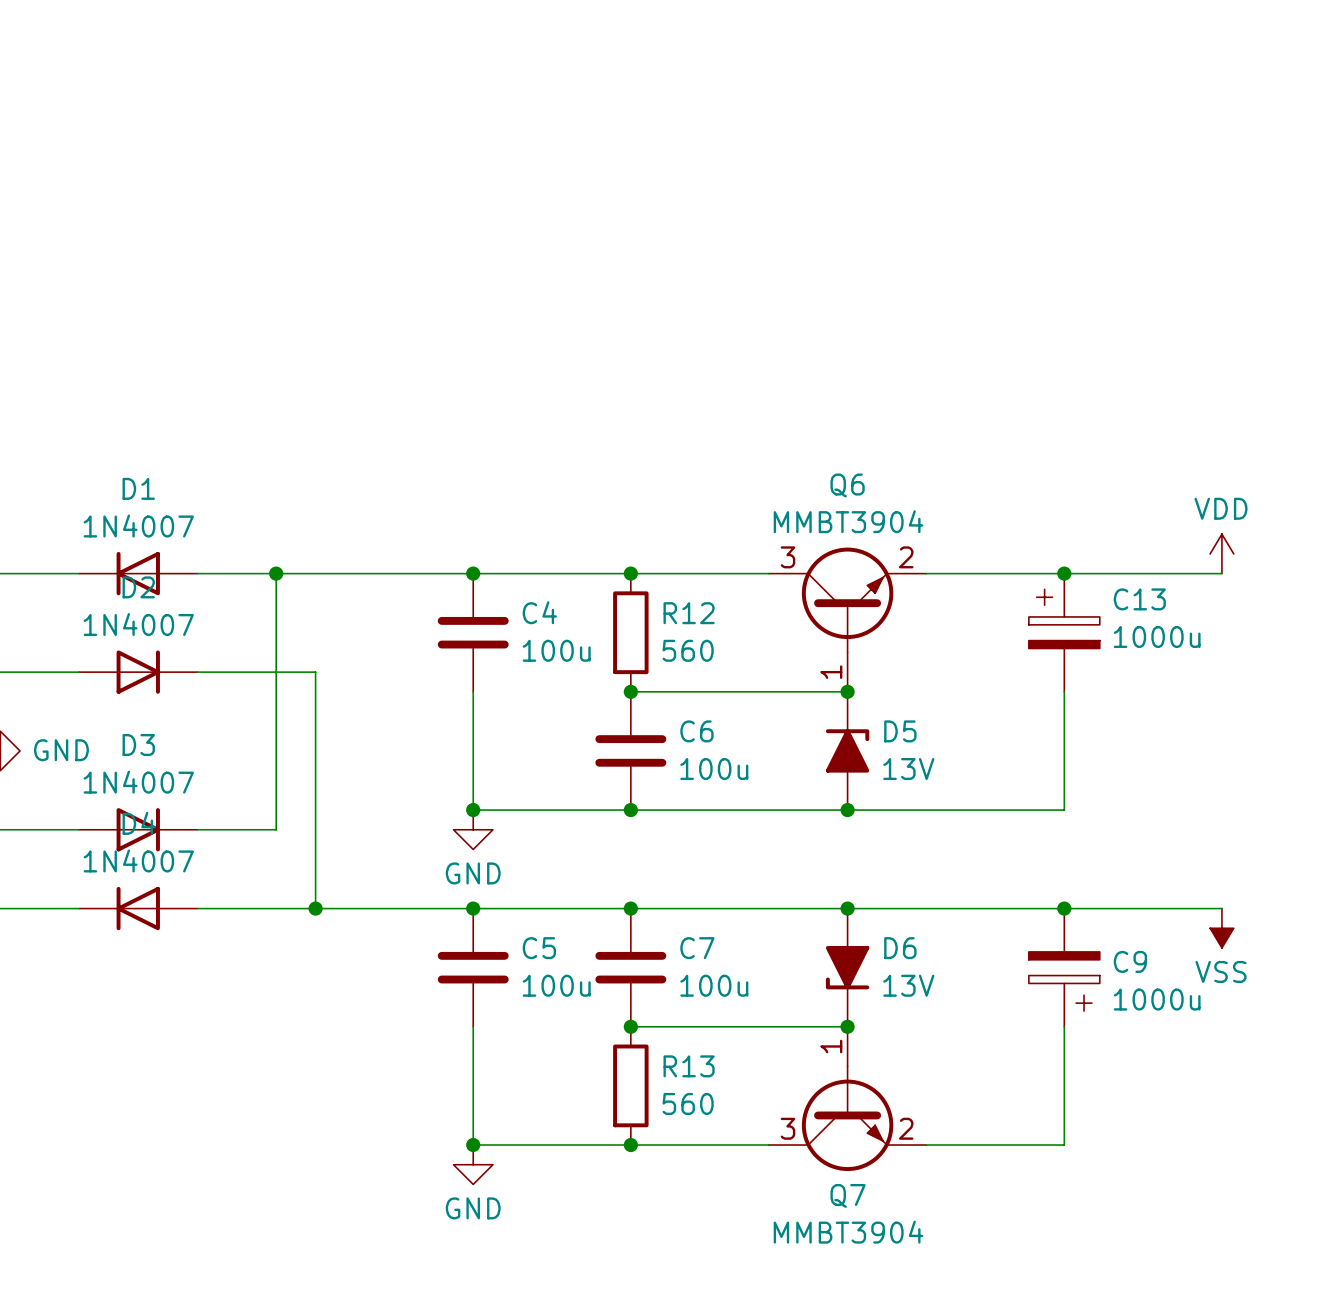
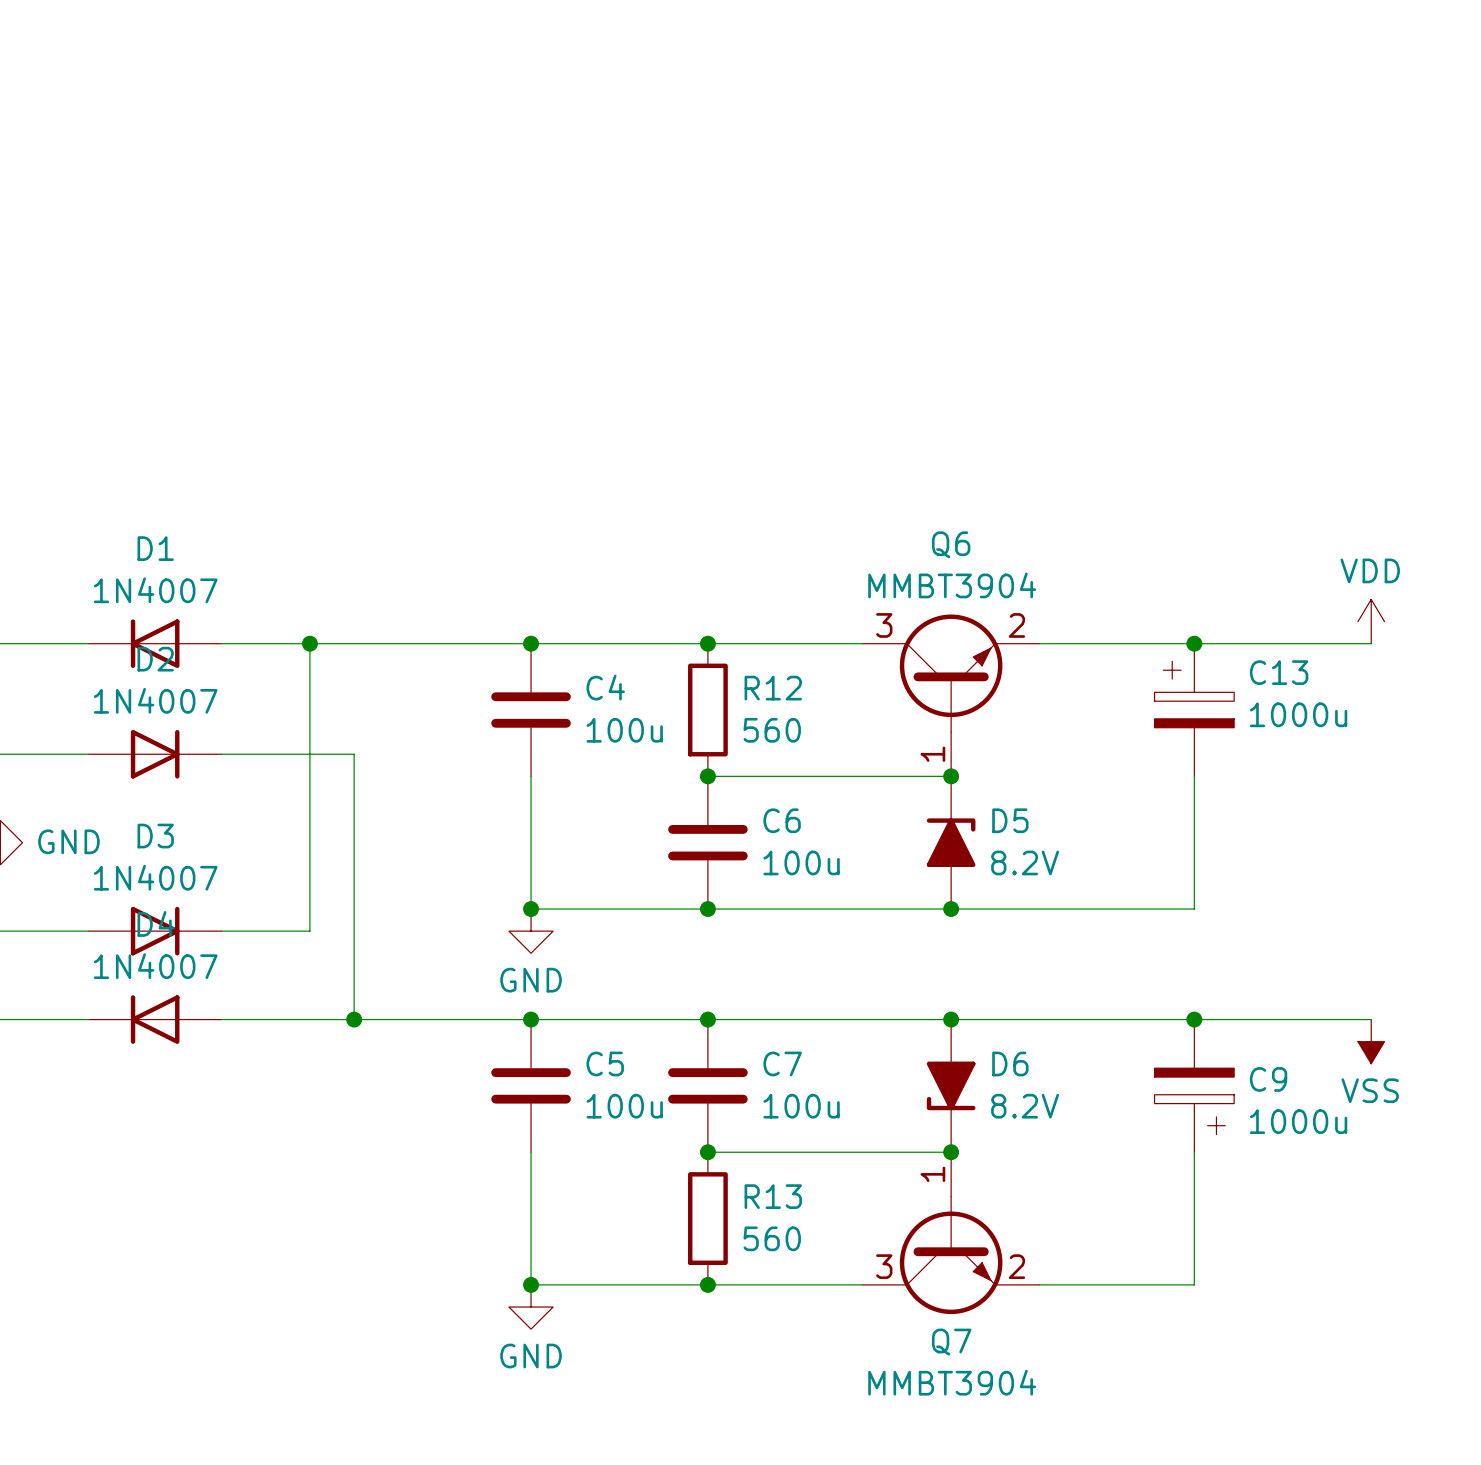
D5 value: 13V (908, 769) -> 8.2V (1025, 862)
D6 value: 13V (908, 985) -> 8.2V (1025, 1106)

